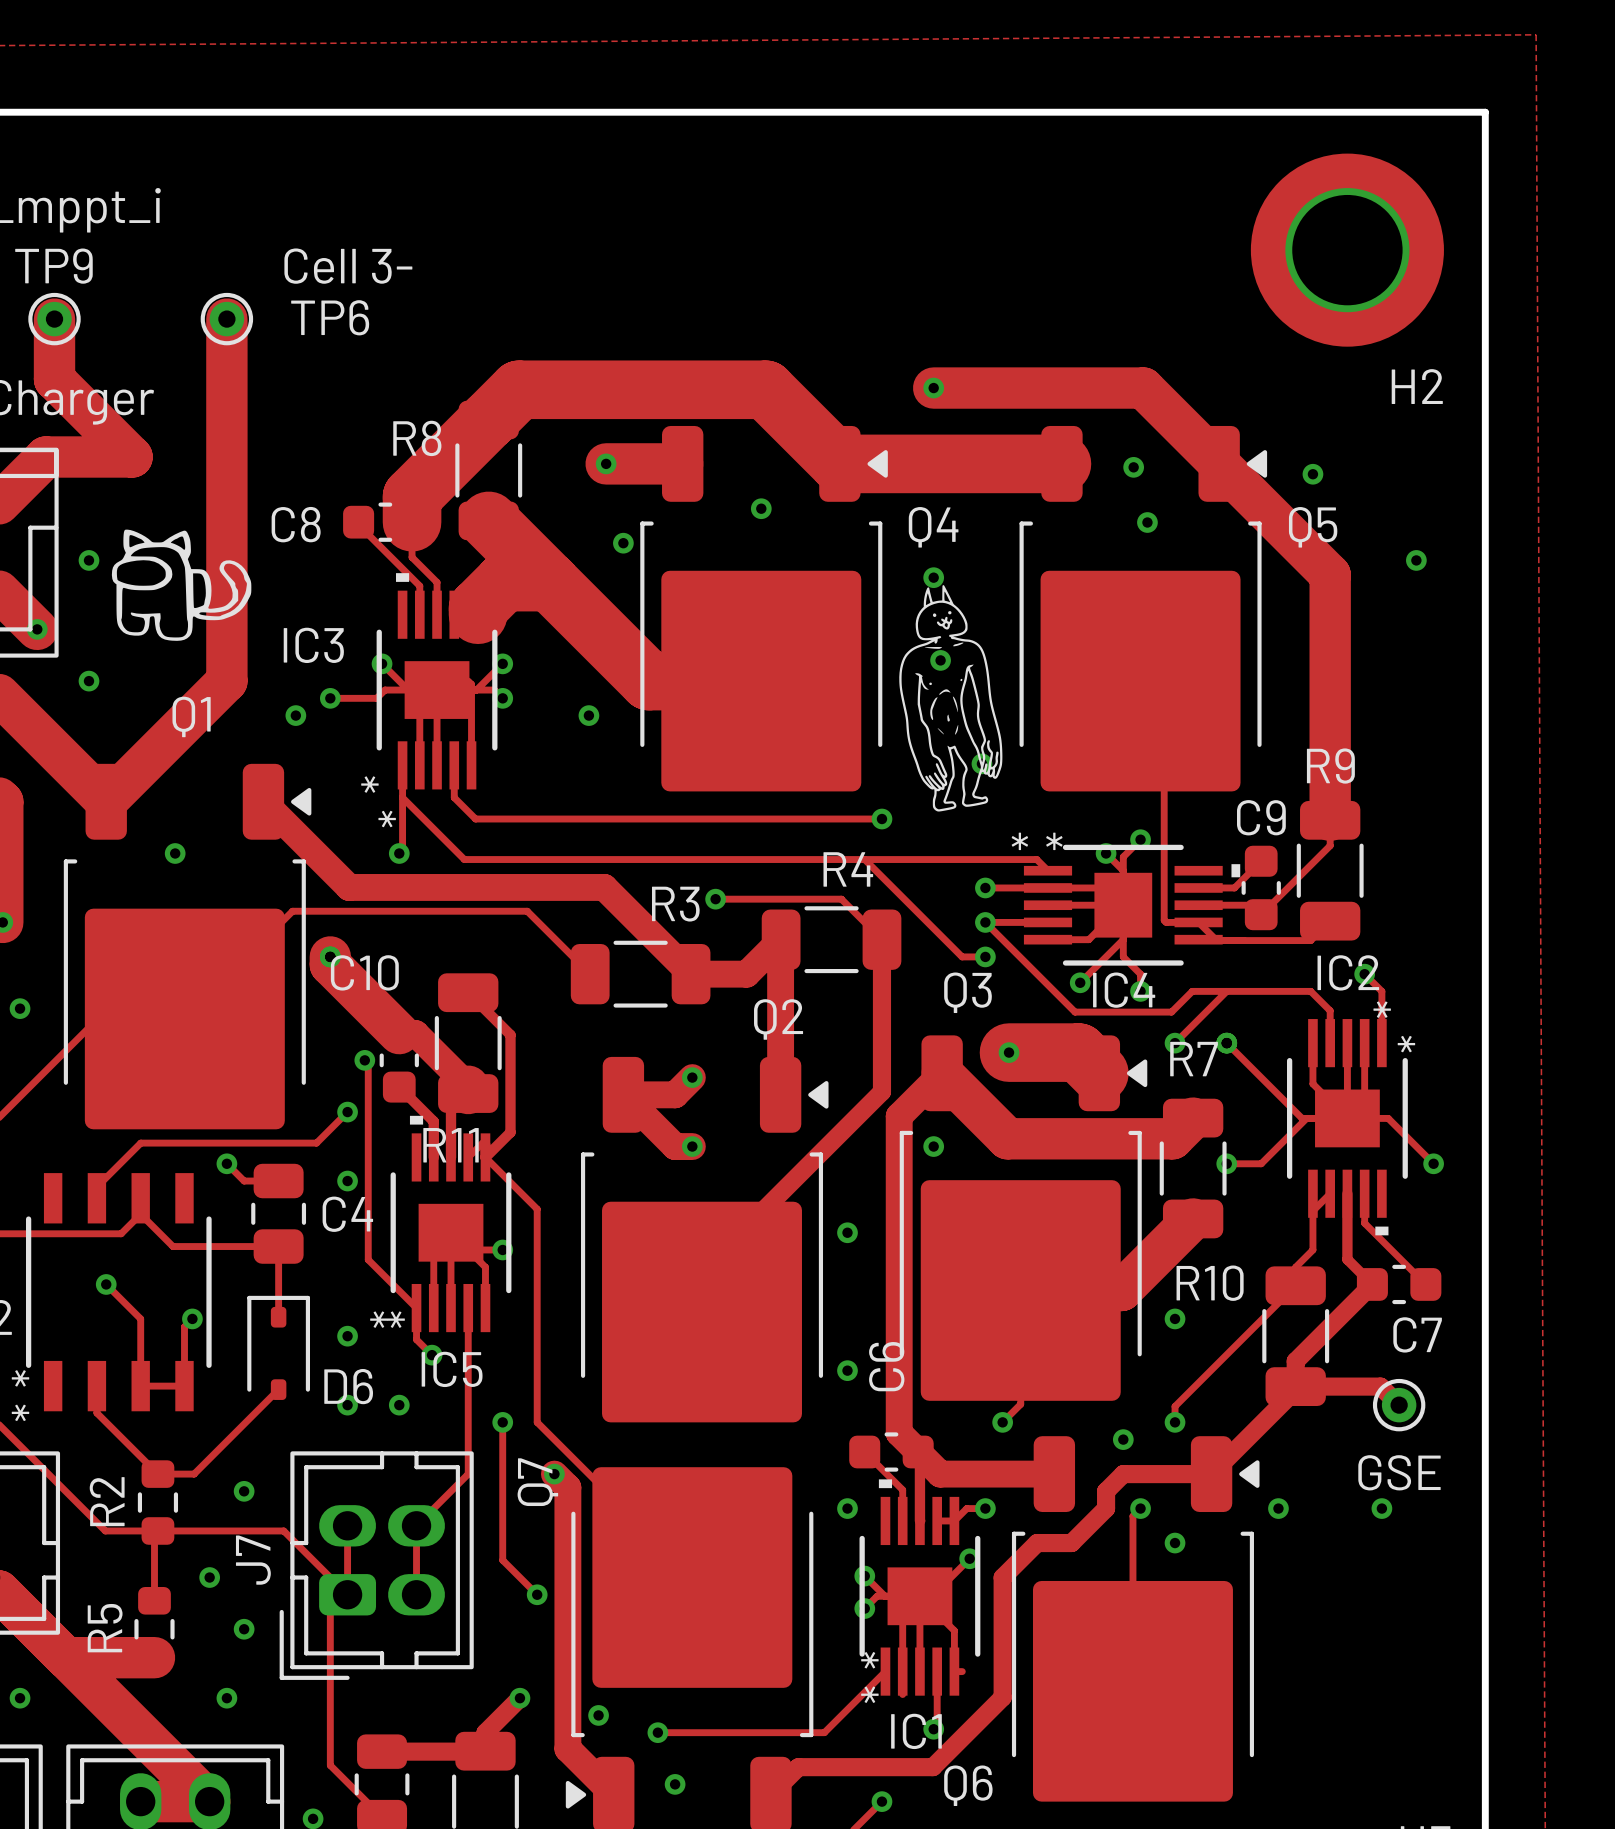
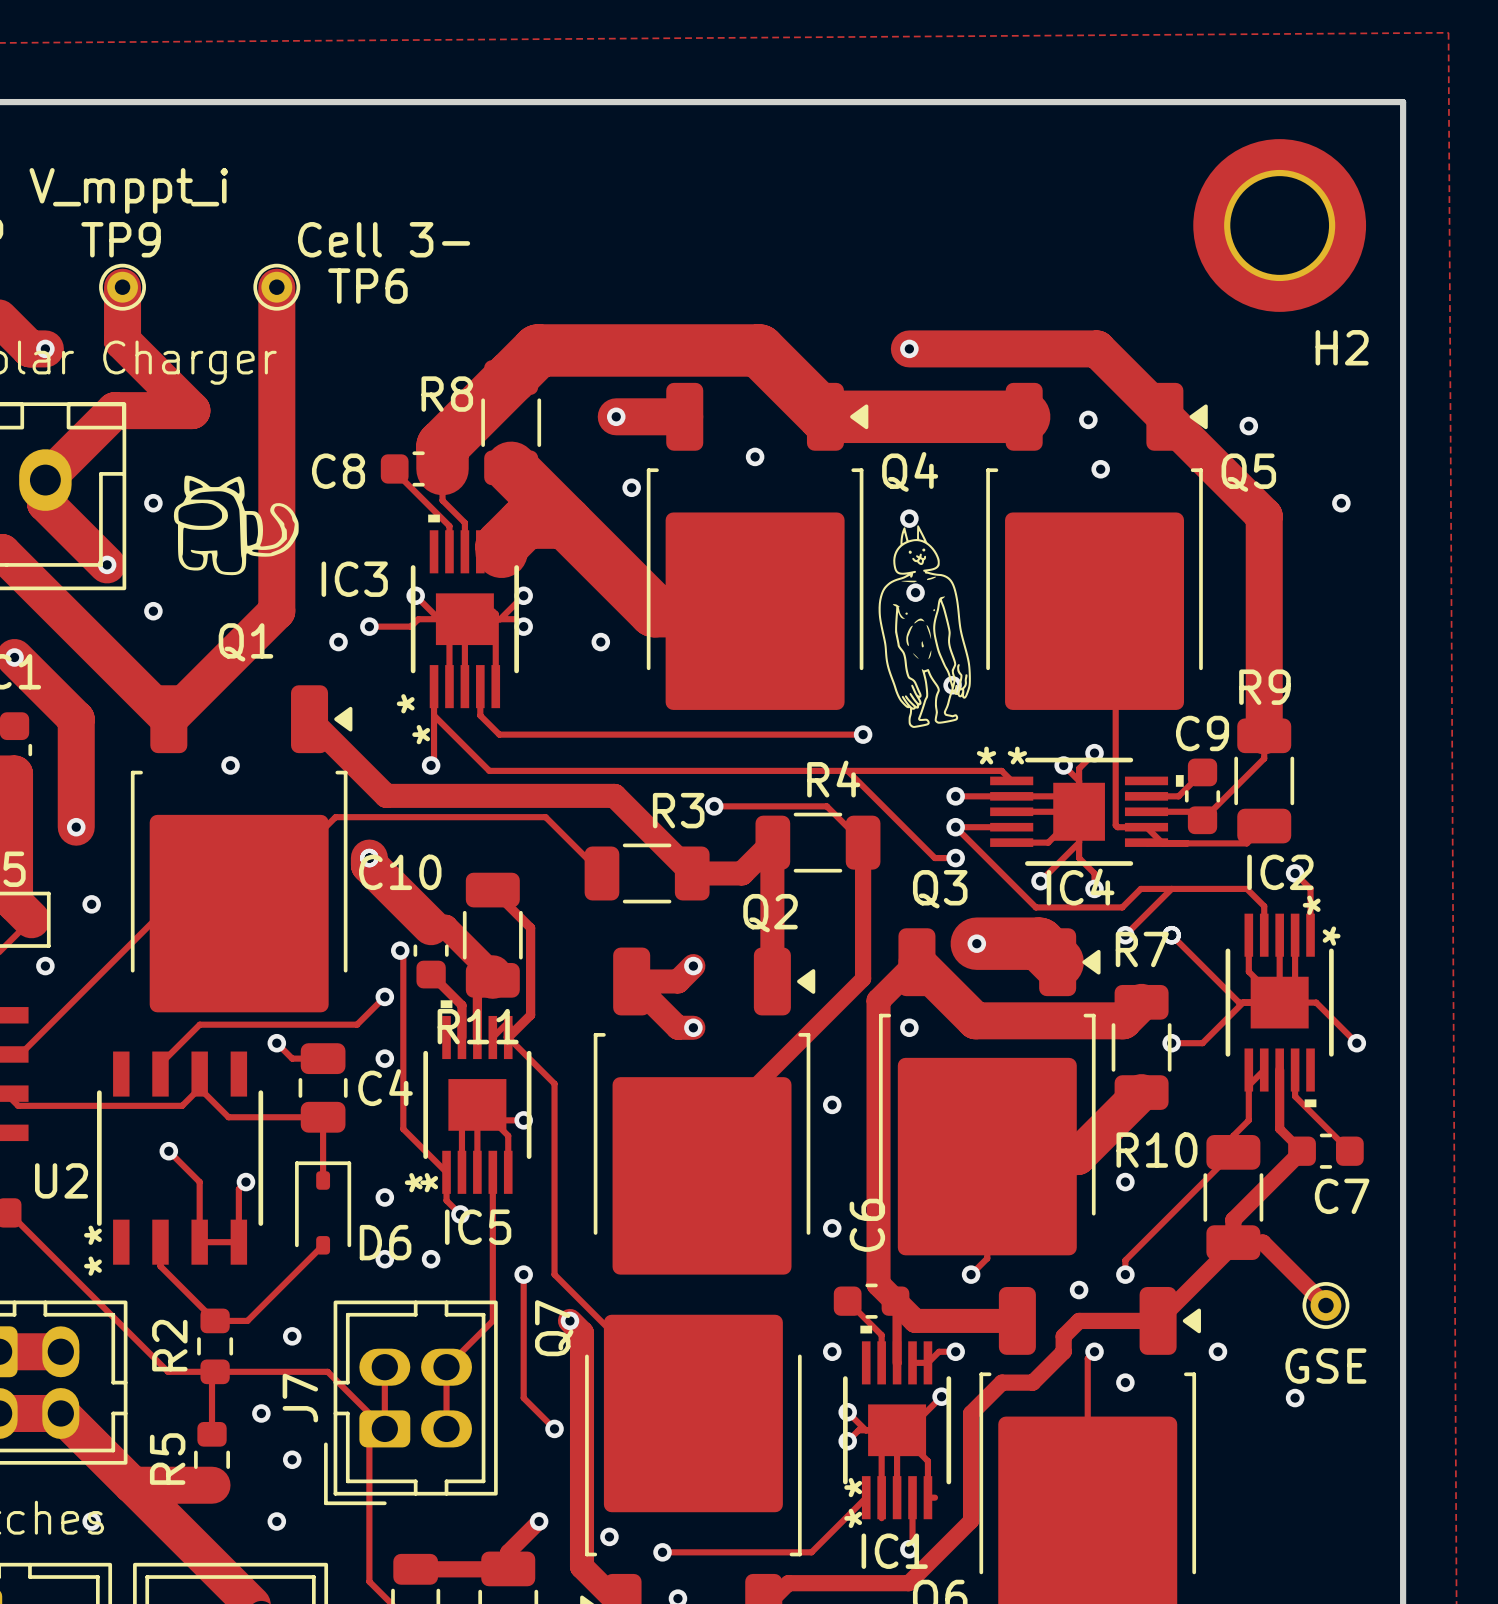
track: (1328, 1386) (1380, 1386) (1399, 1405) -> (1263, 1242) (1325, 1305)
GSE position: (1399, 1405) -> (1325, 1305)
via position: (1381, 1508) -> (1295, 1398)

